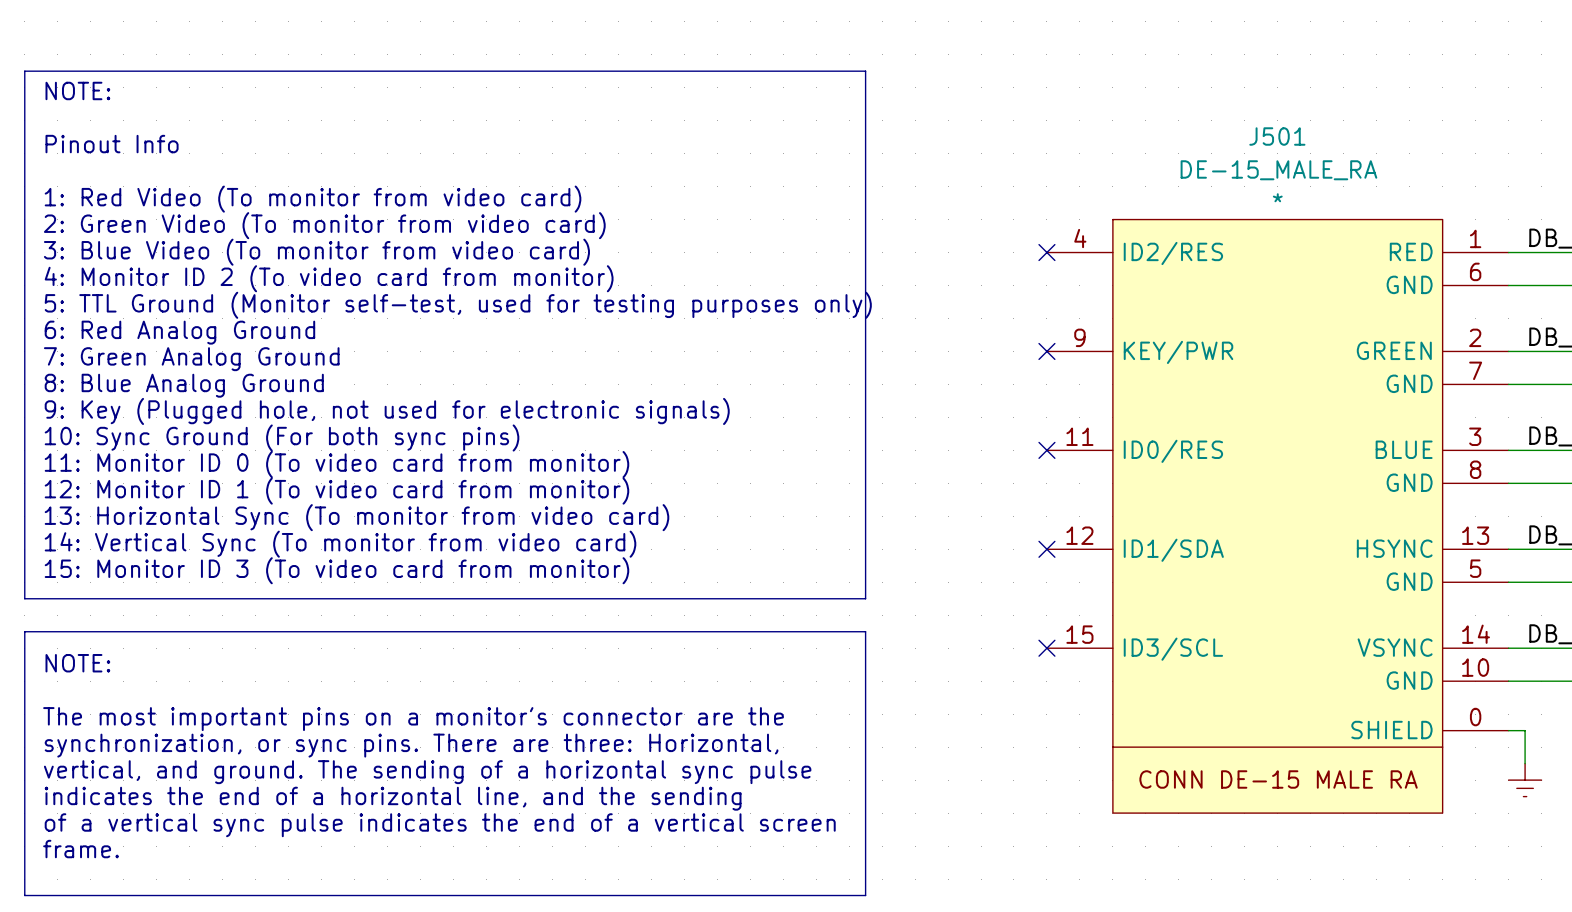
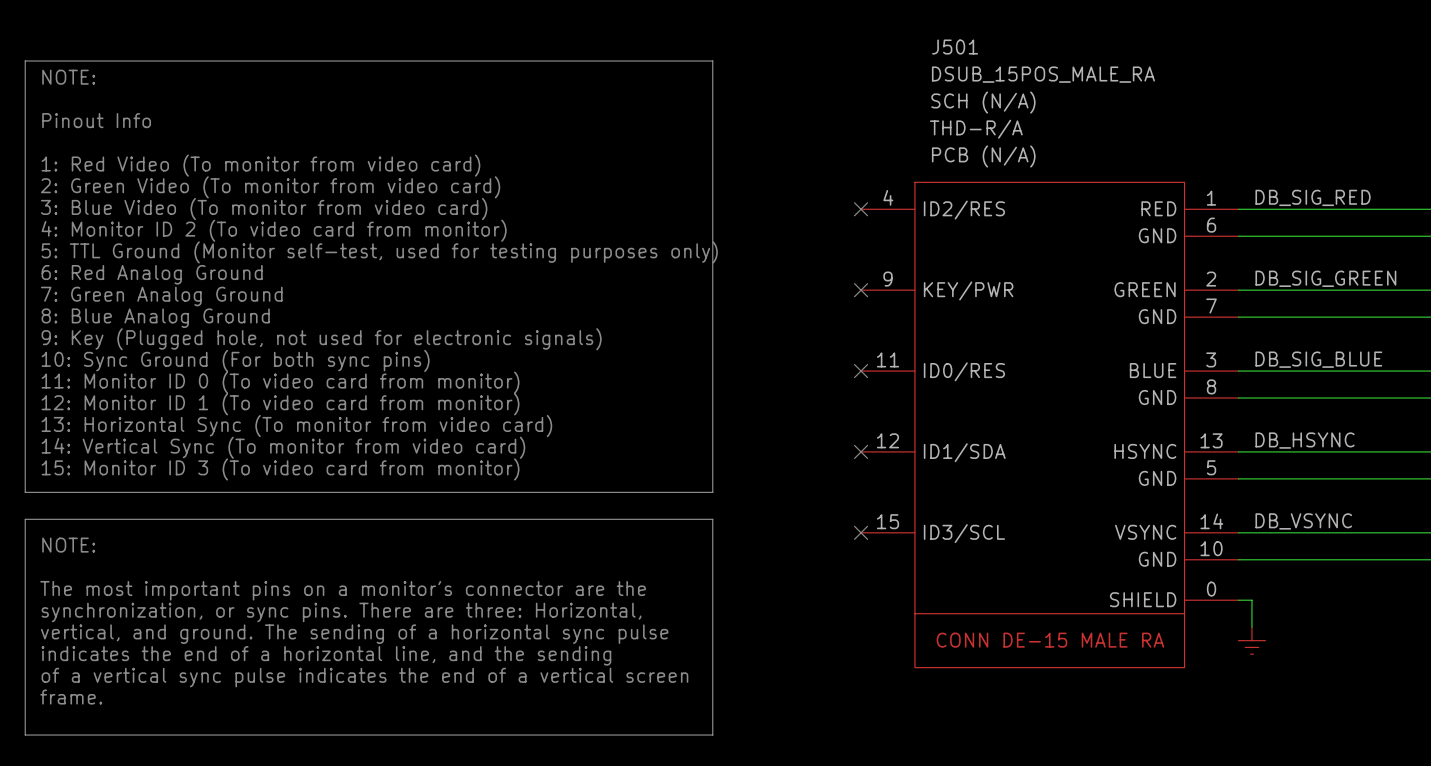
J501 name position: J501 (1277, 136) -> J501 (955, 47)
J501 text: none -> THD-R/A (976, 129)
J501 value: DE-15_MALE_RA (1278, 170) -> DSUB_15POS_MALE_RA (1043, 74)
J501 text: none -> PCB (N/A) (983, 156)
J501 text: * (1277, 197) -> SCH (N/A) (983, 102)

